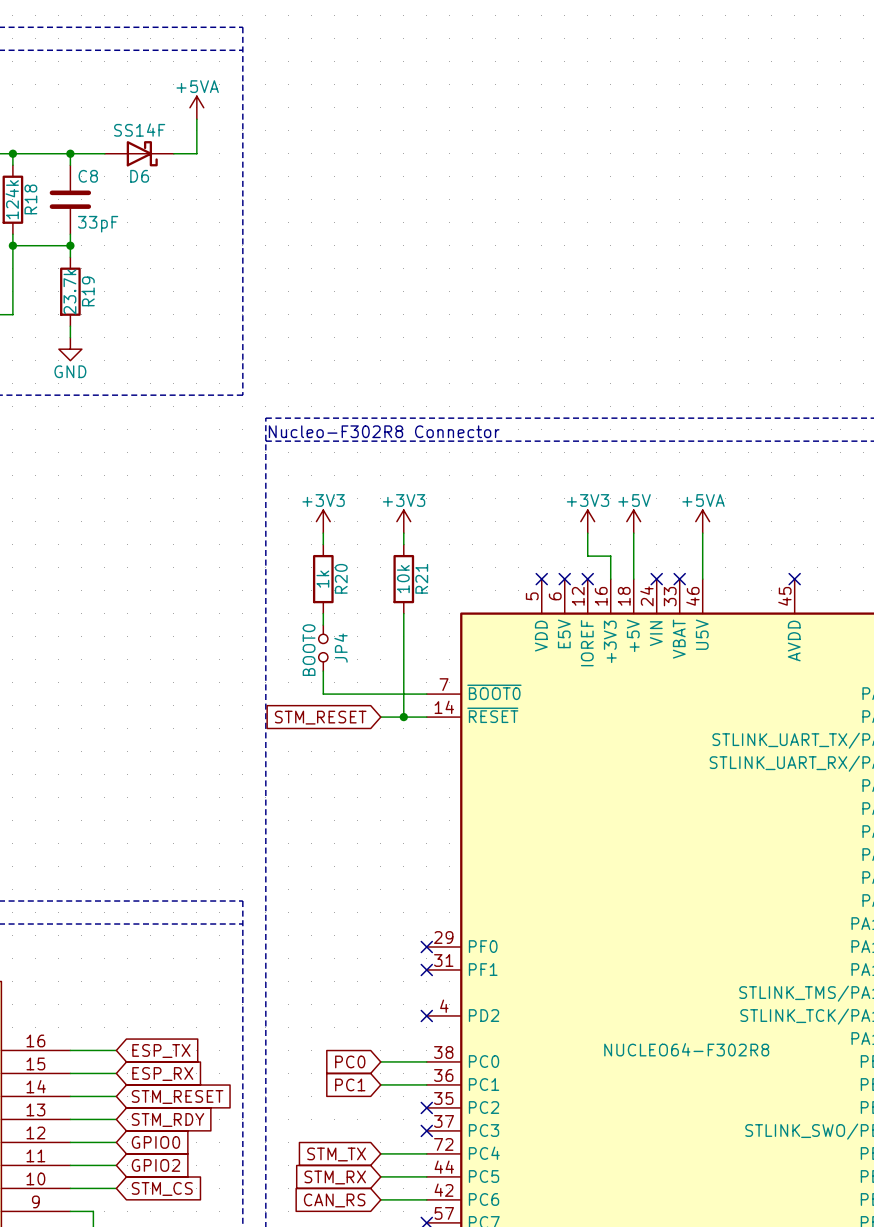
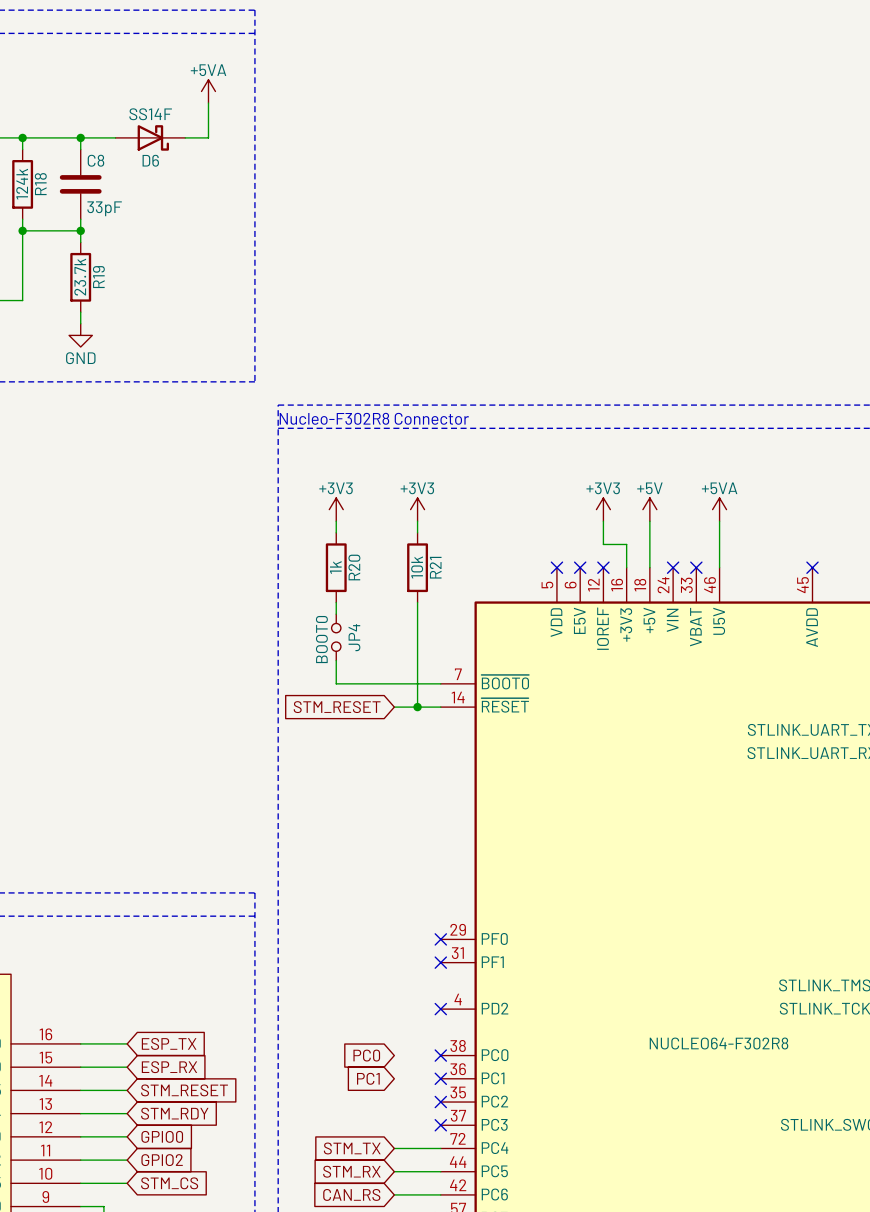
wire: (380, 1061) (426, 1061) -> none
no-connect mark: none -> (440, 1055)
wire: (380, 1084) (426, 1084) -> none
no-connect mark: none -> (440, 1078)

